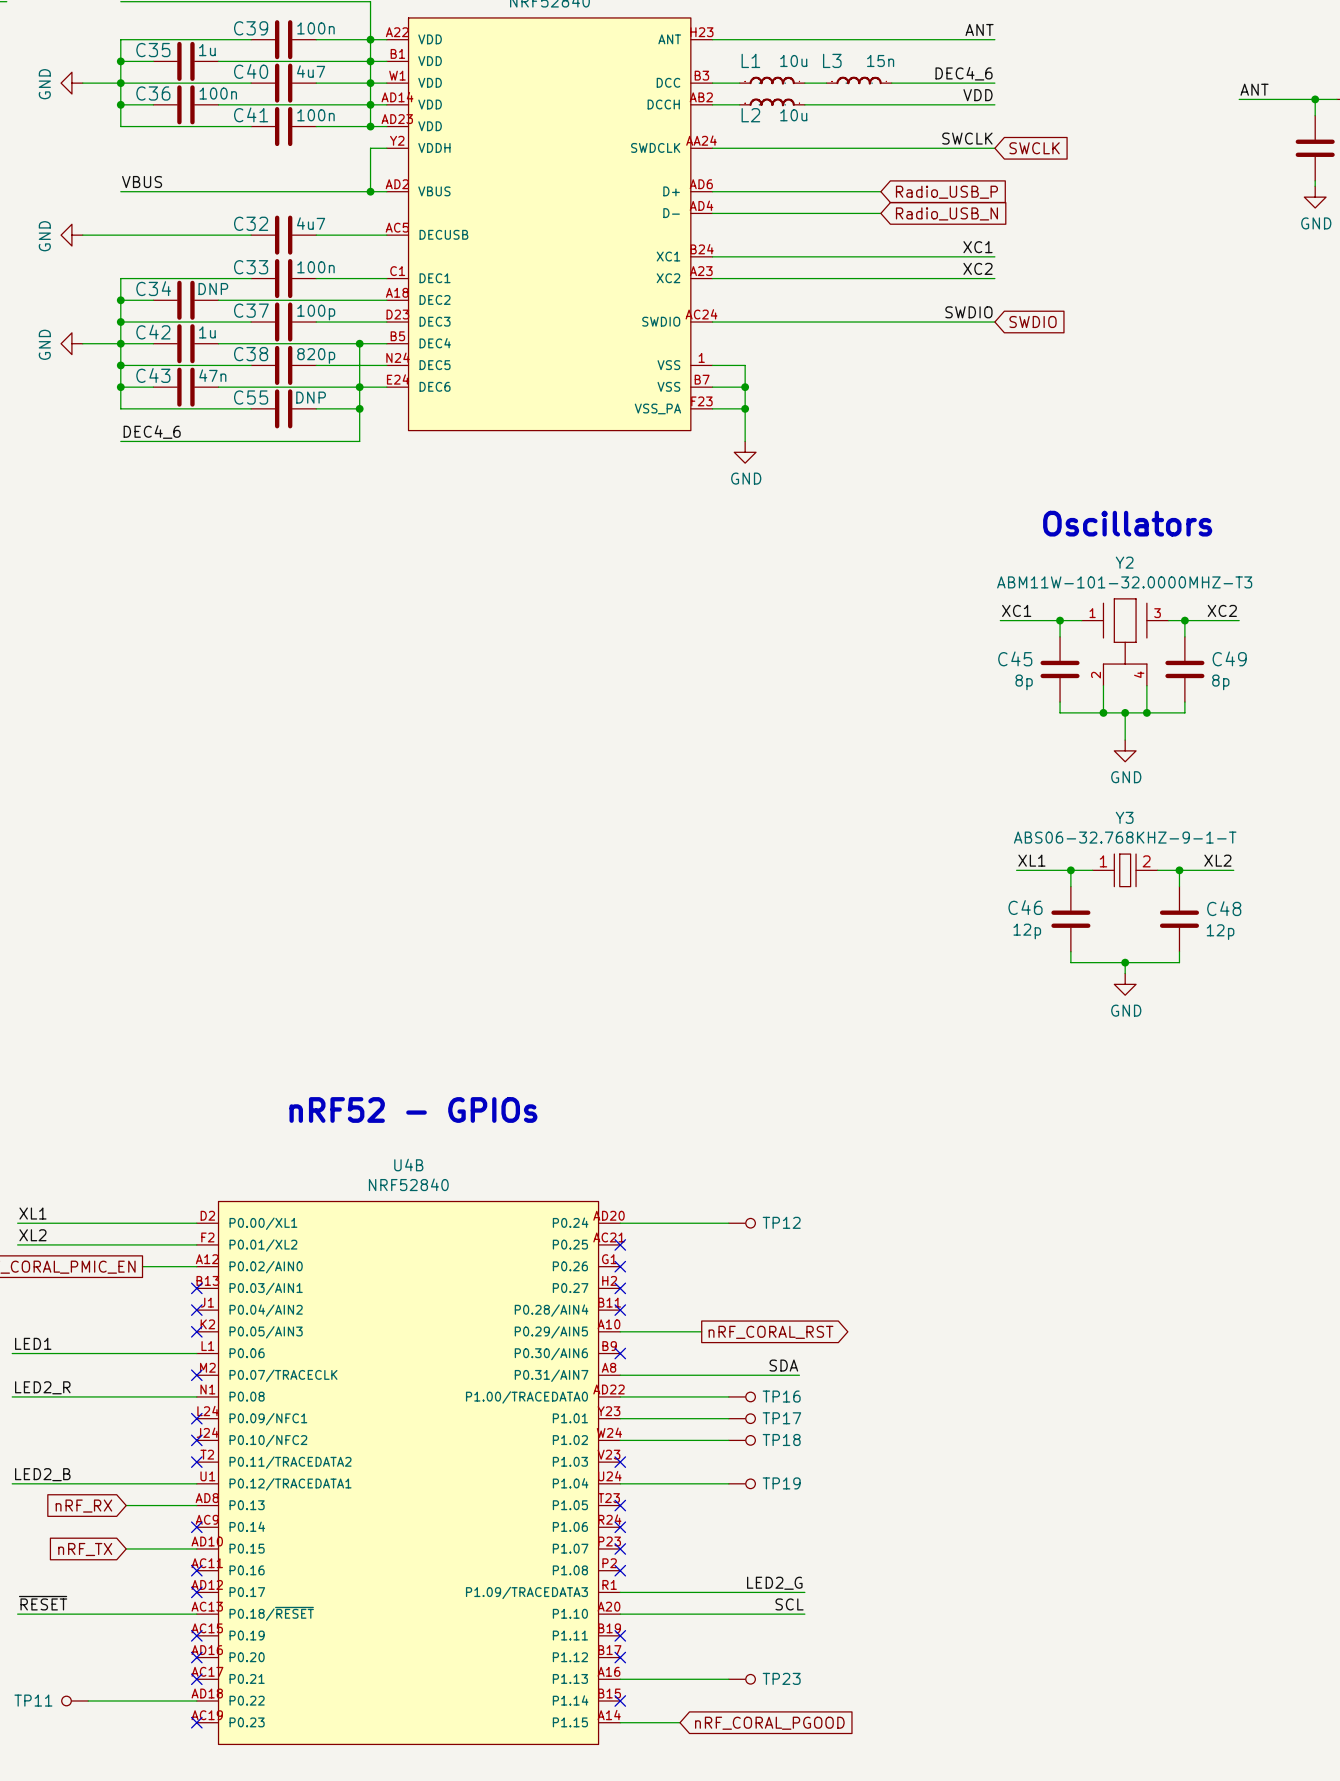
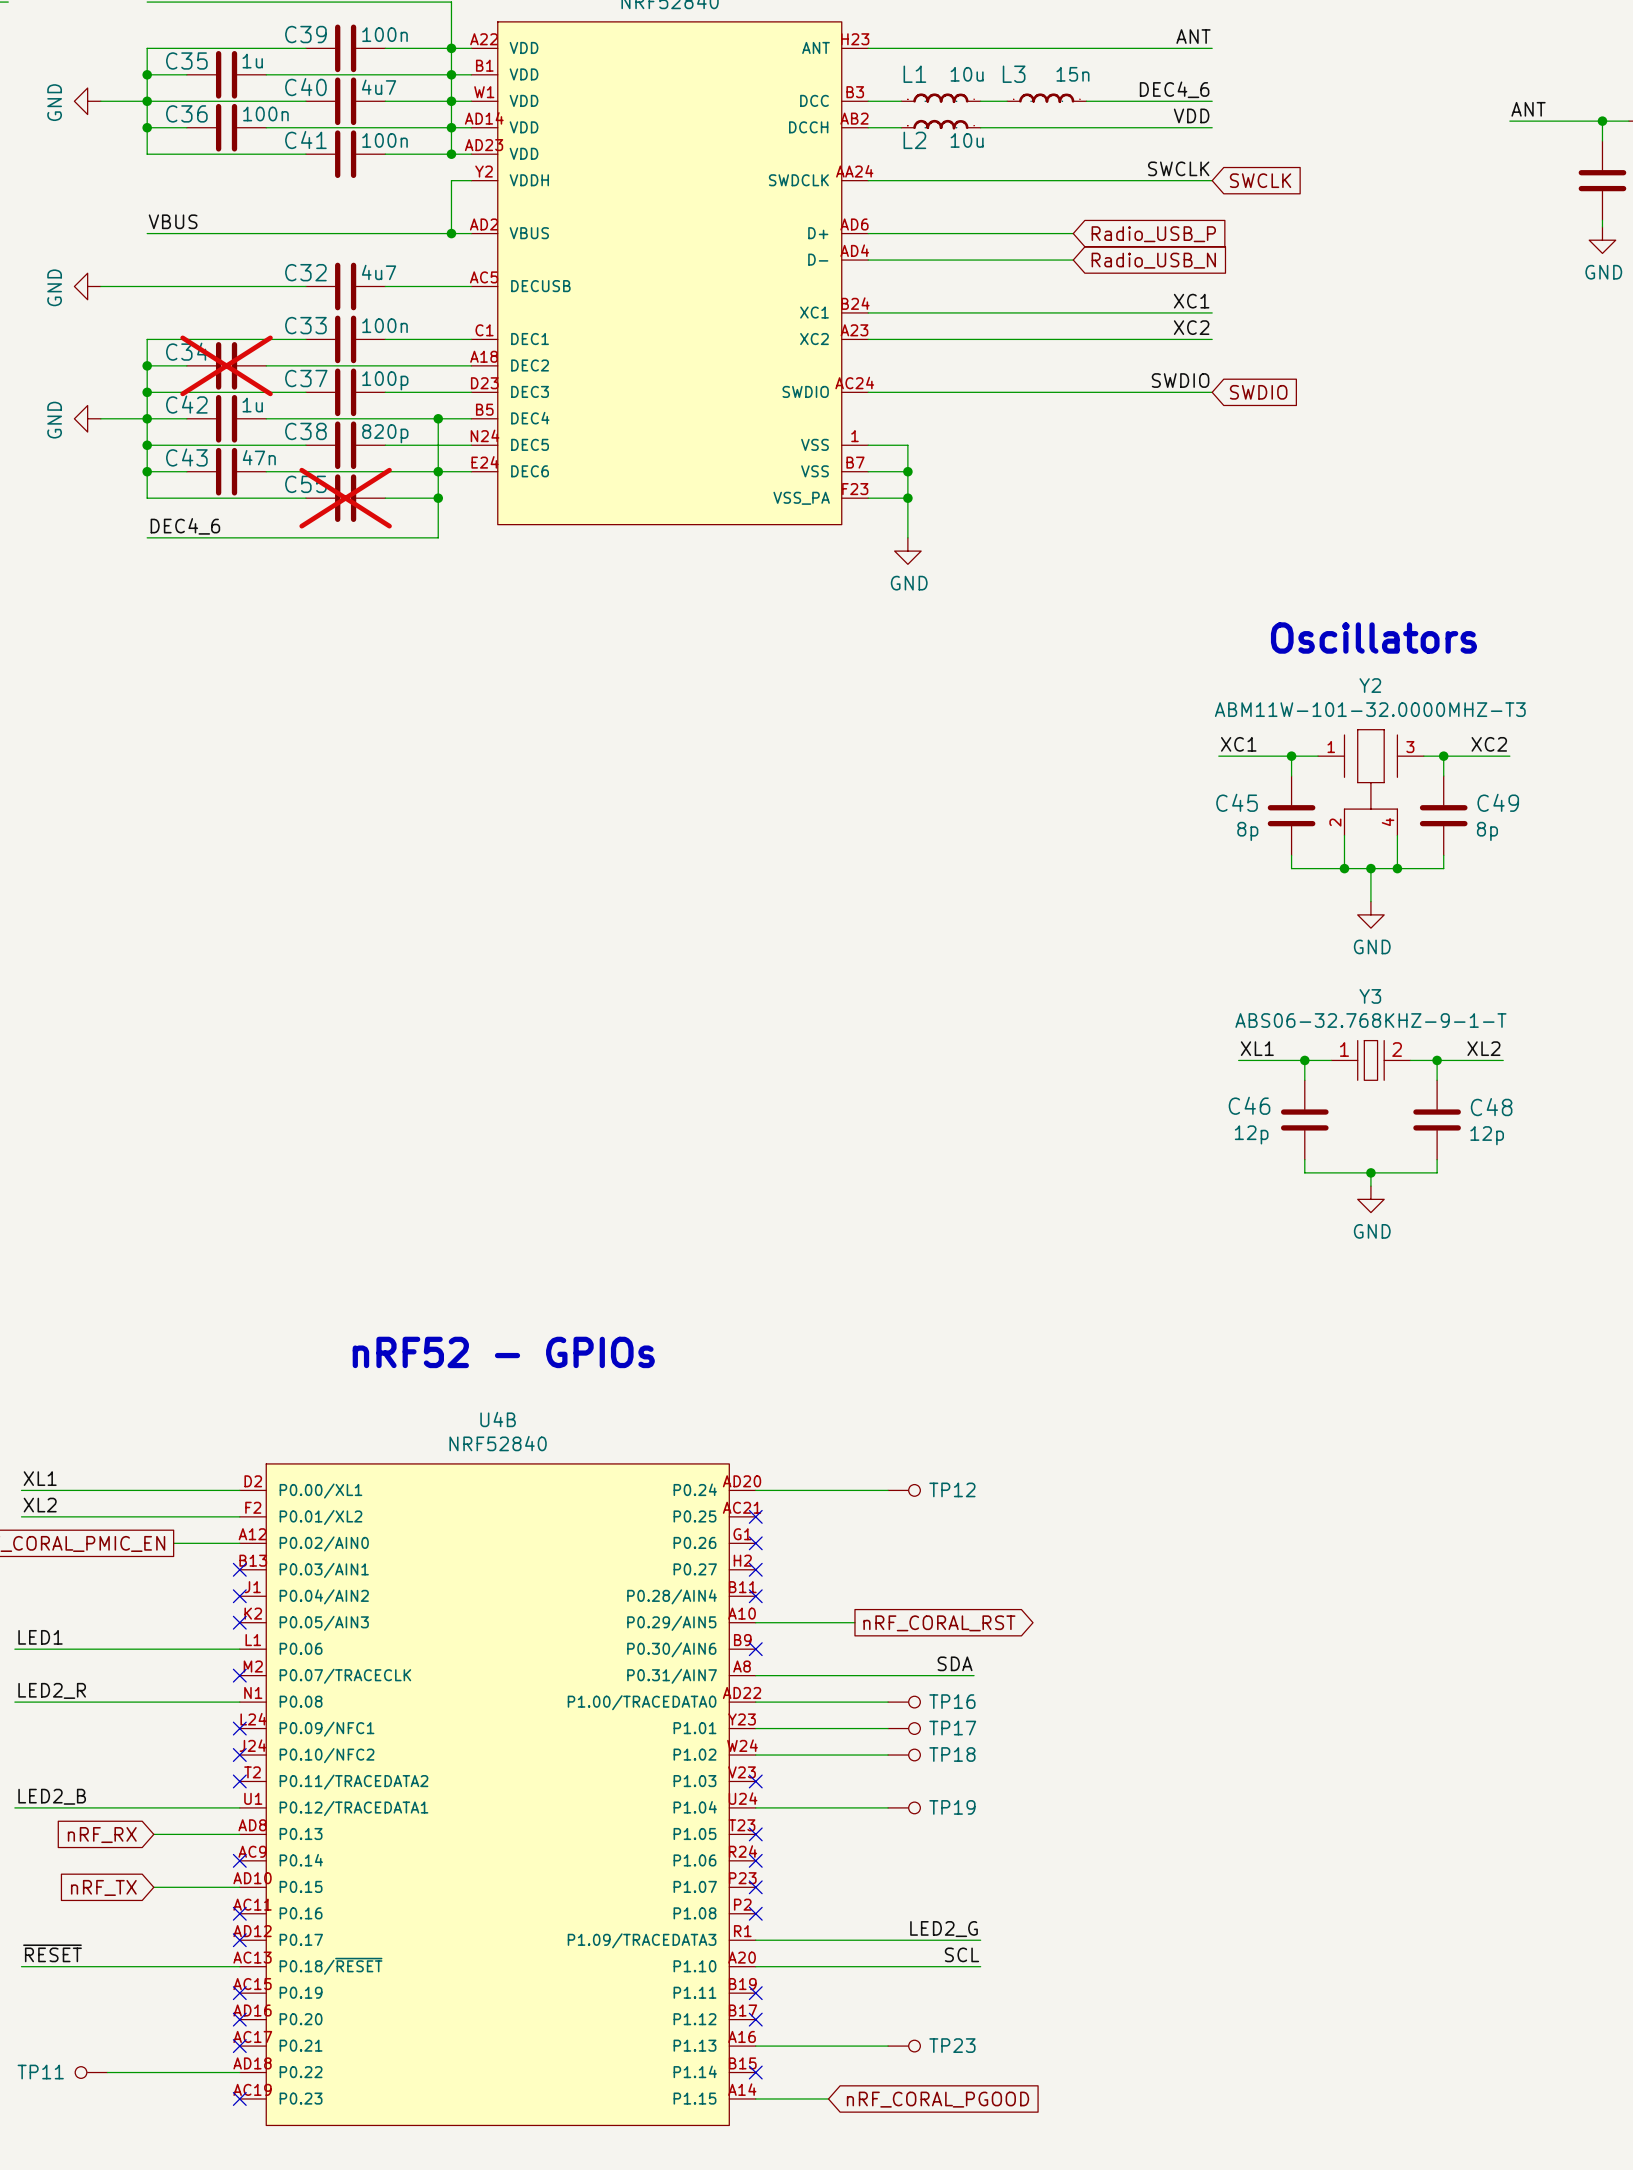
C34 text: DNP (213, 289) -> none
C34 do-not-place cross: none -> (226, 365)
C55 text: DNP (311, 397) -> none
C55 do-not-place cross: none -> (345, 498)

